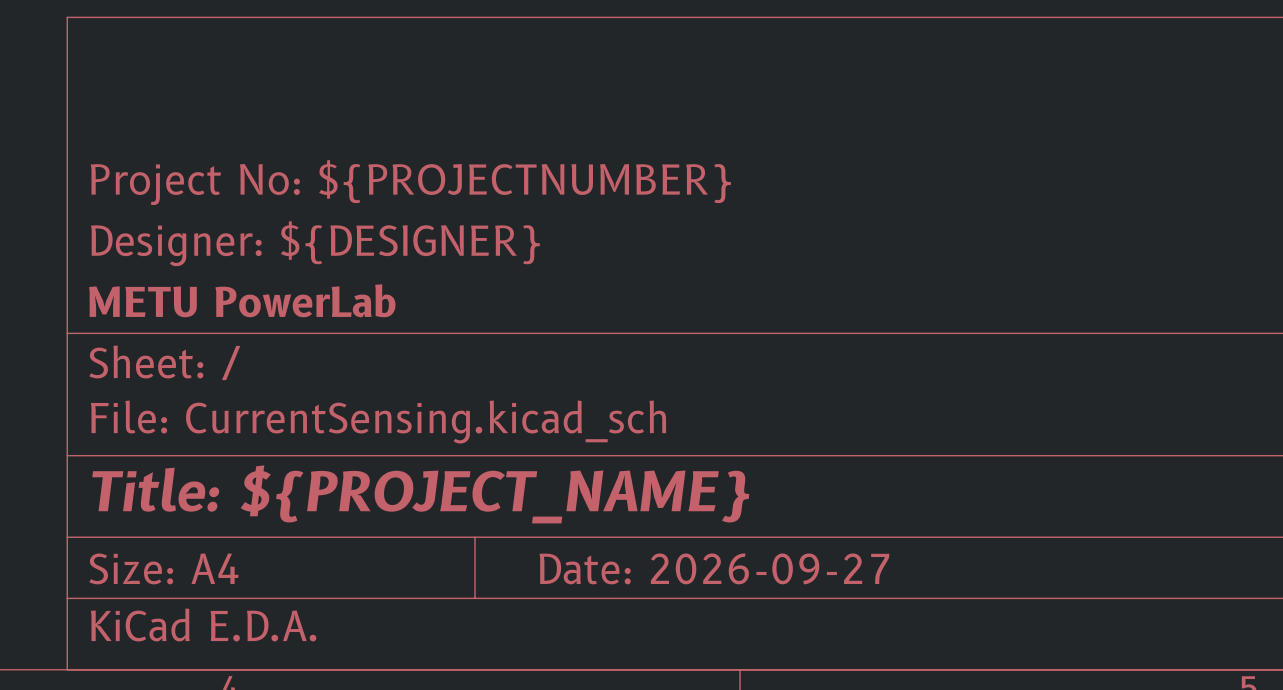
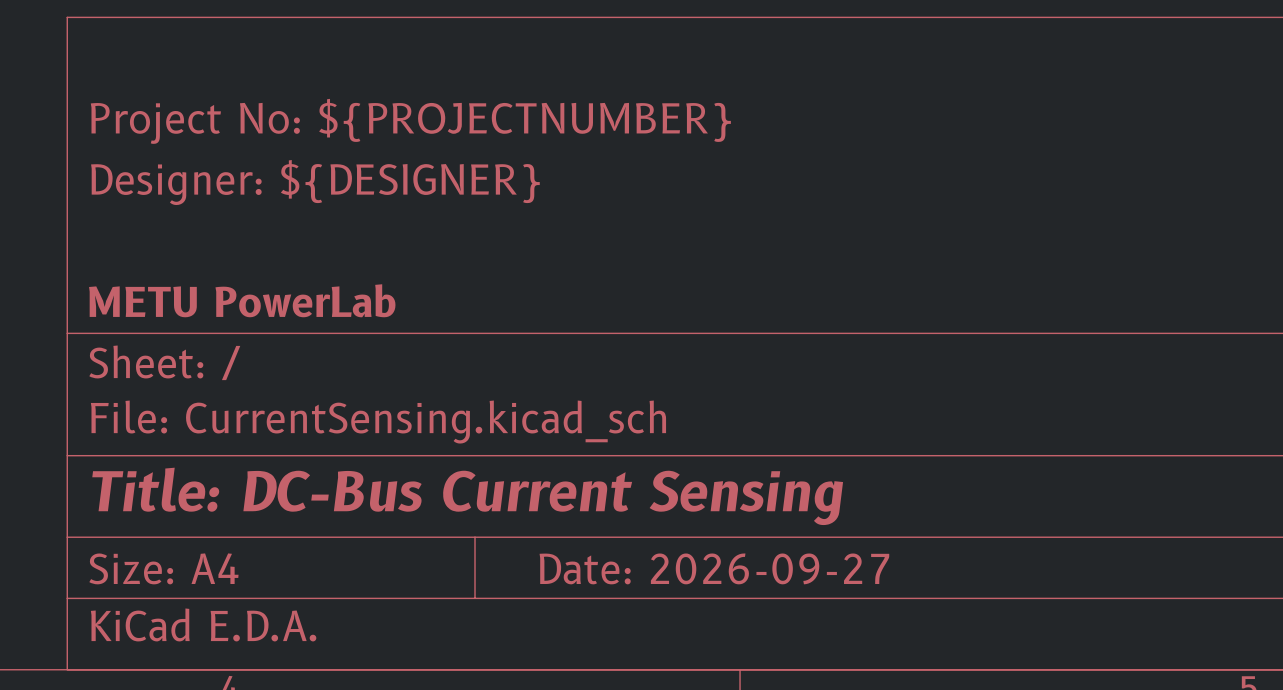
title block: none -> Project No: ${PROJECTNUMBER} (410, 121)
title block: Project No: ${PROJECTNUMBER} (410, 182) -> Designer: ${DESIGNER} (315, 182)
title block: Designer: ${DESIGNER} (315, 243) -> none
title block: Title: ${PROJECT_NAME} (420, 494) -> Title: DC-Bus Current Sensing (467, 496)

